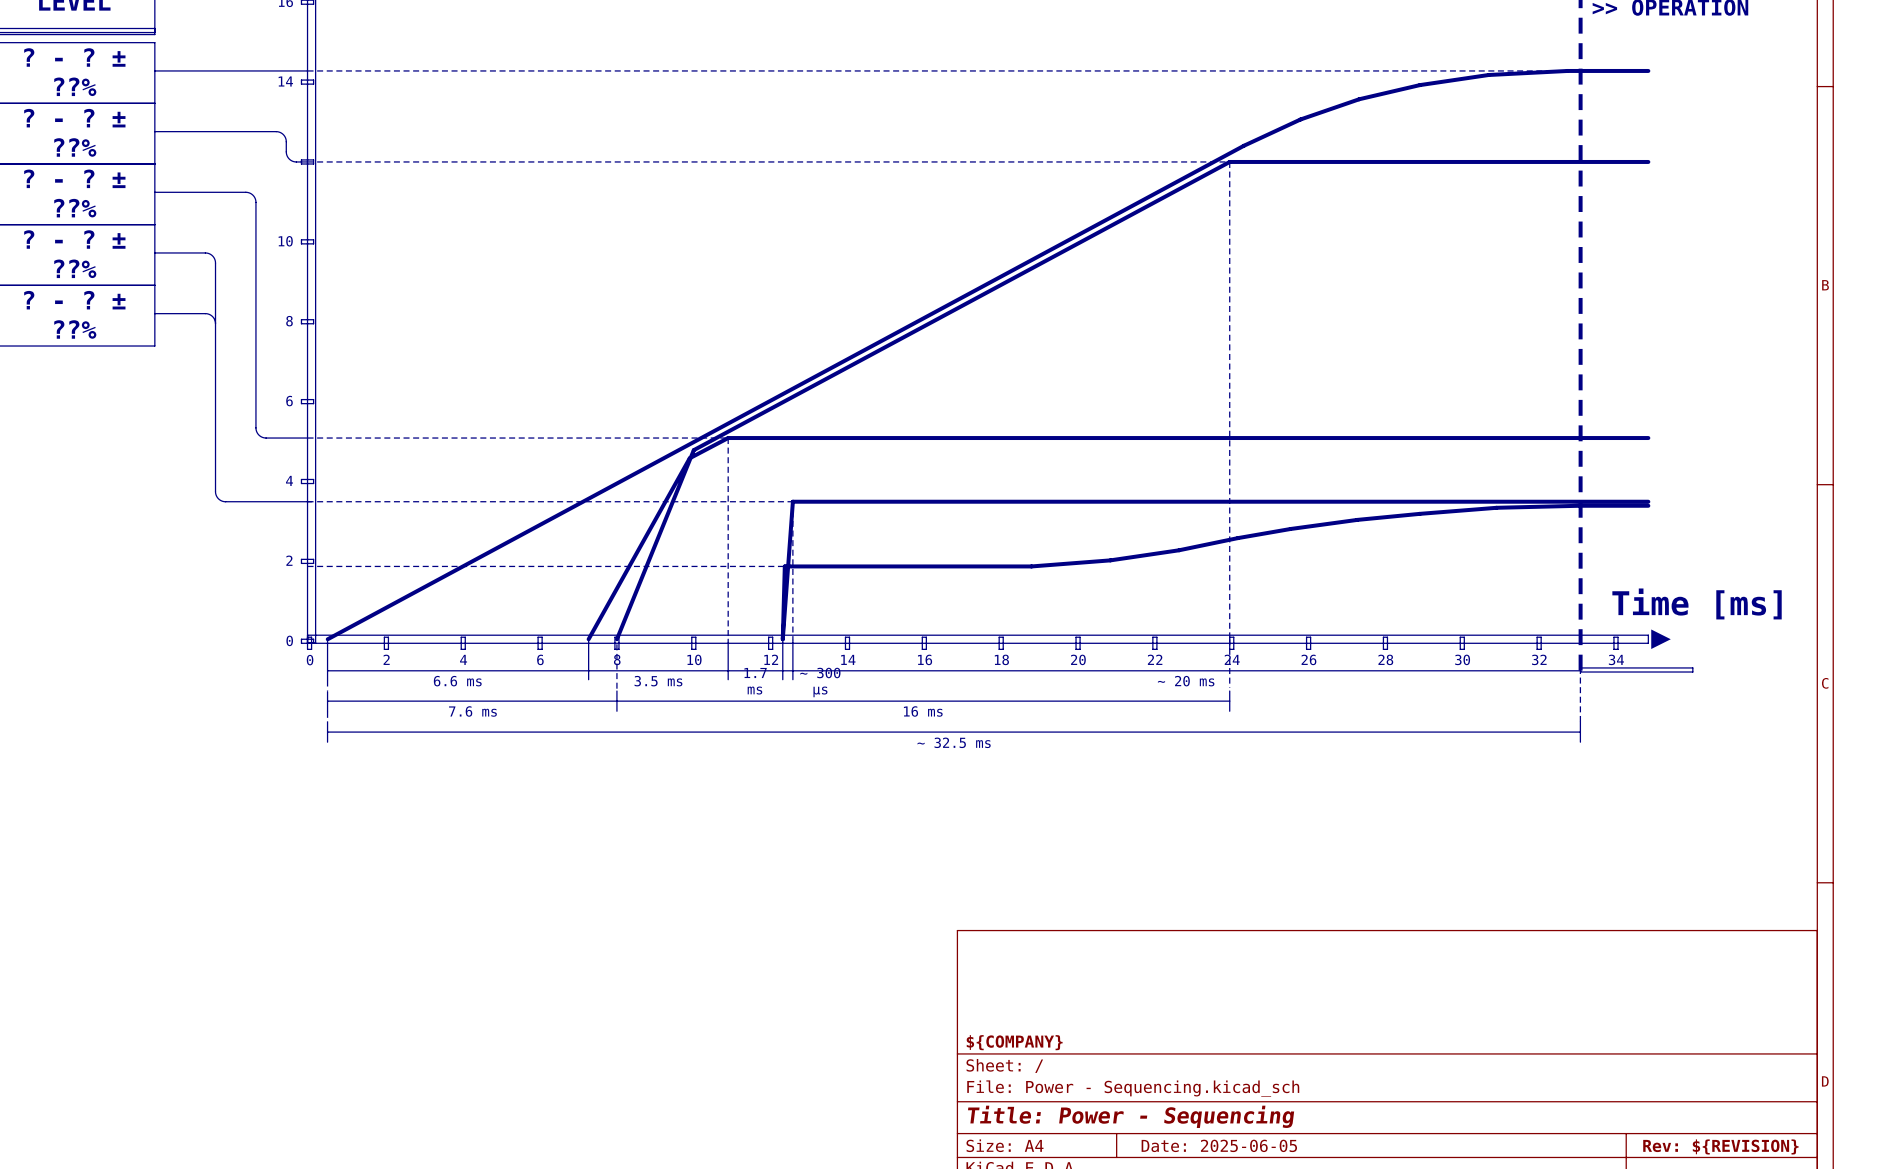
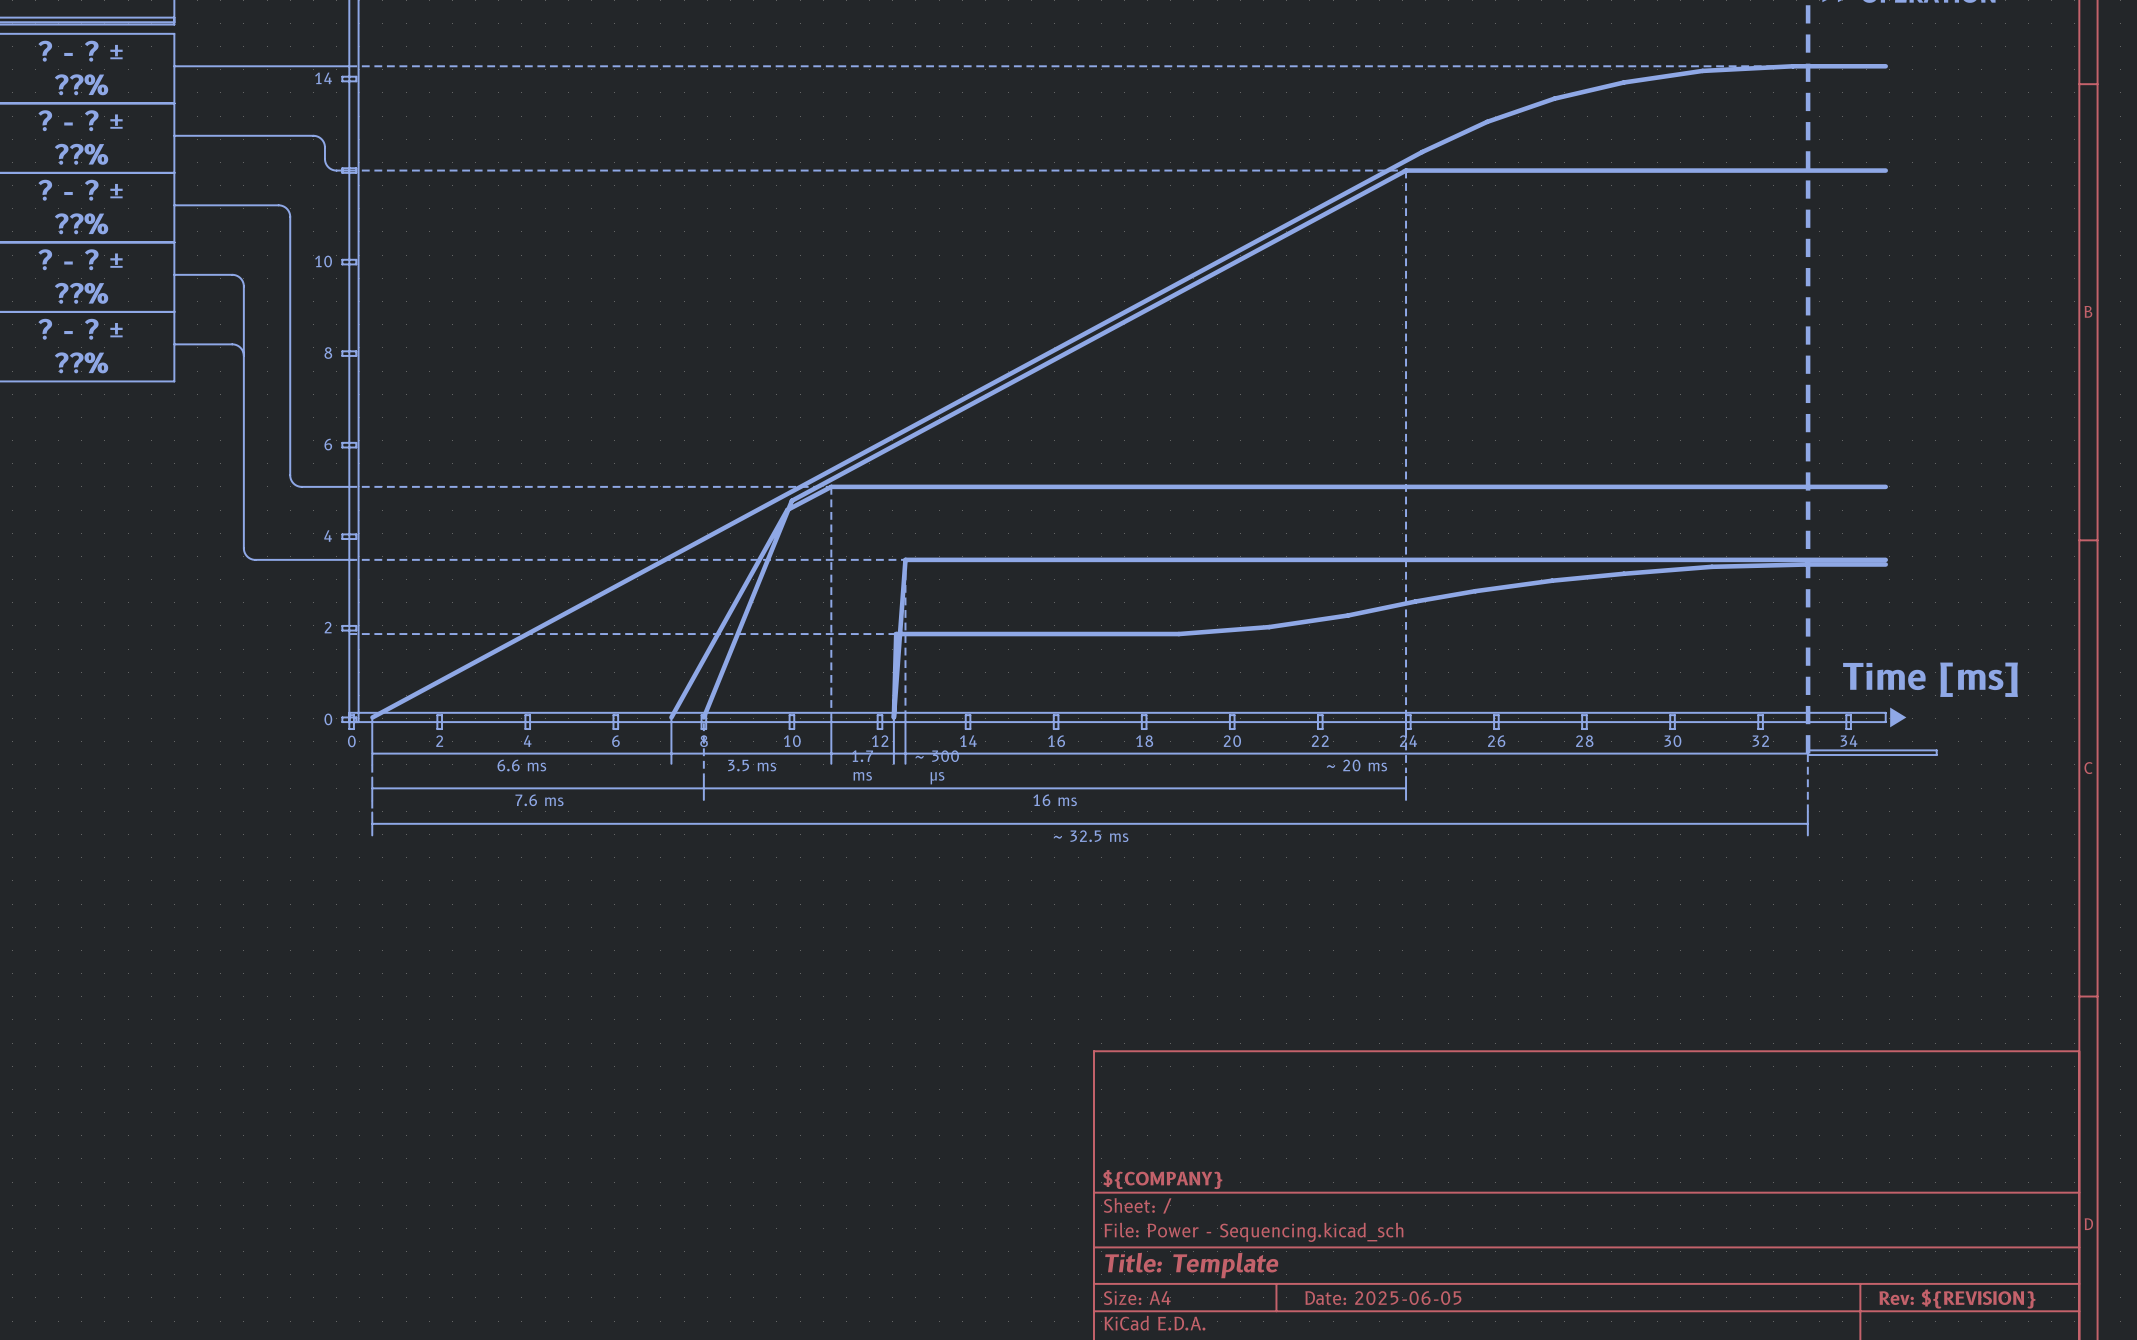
title block: Title: Power - Sequencing (1131, 1116) -> Title: Template (1191, 1265)

